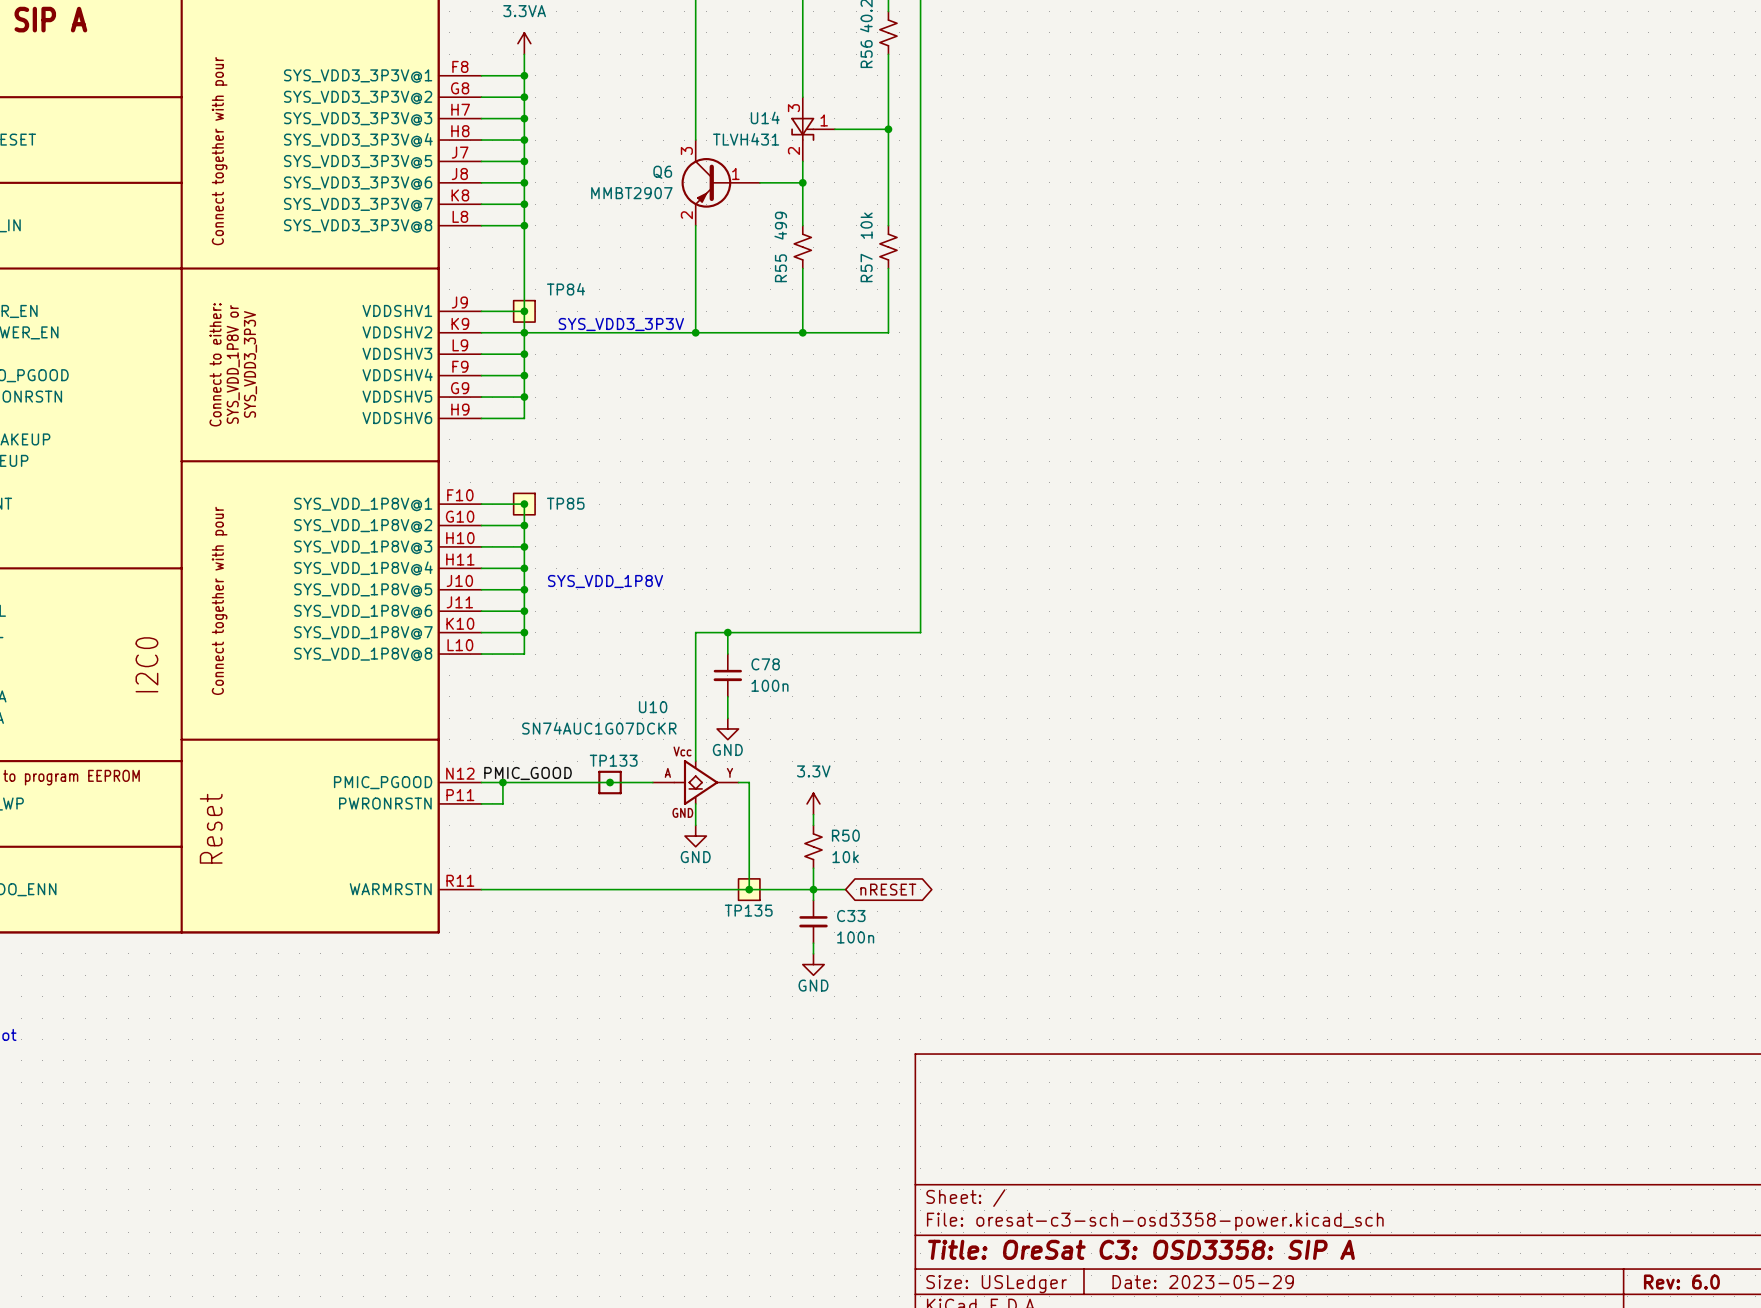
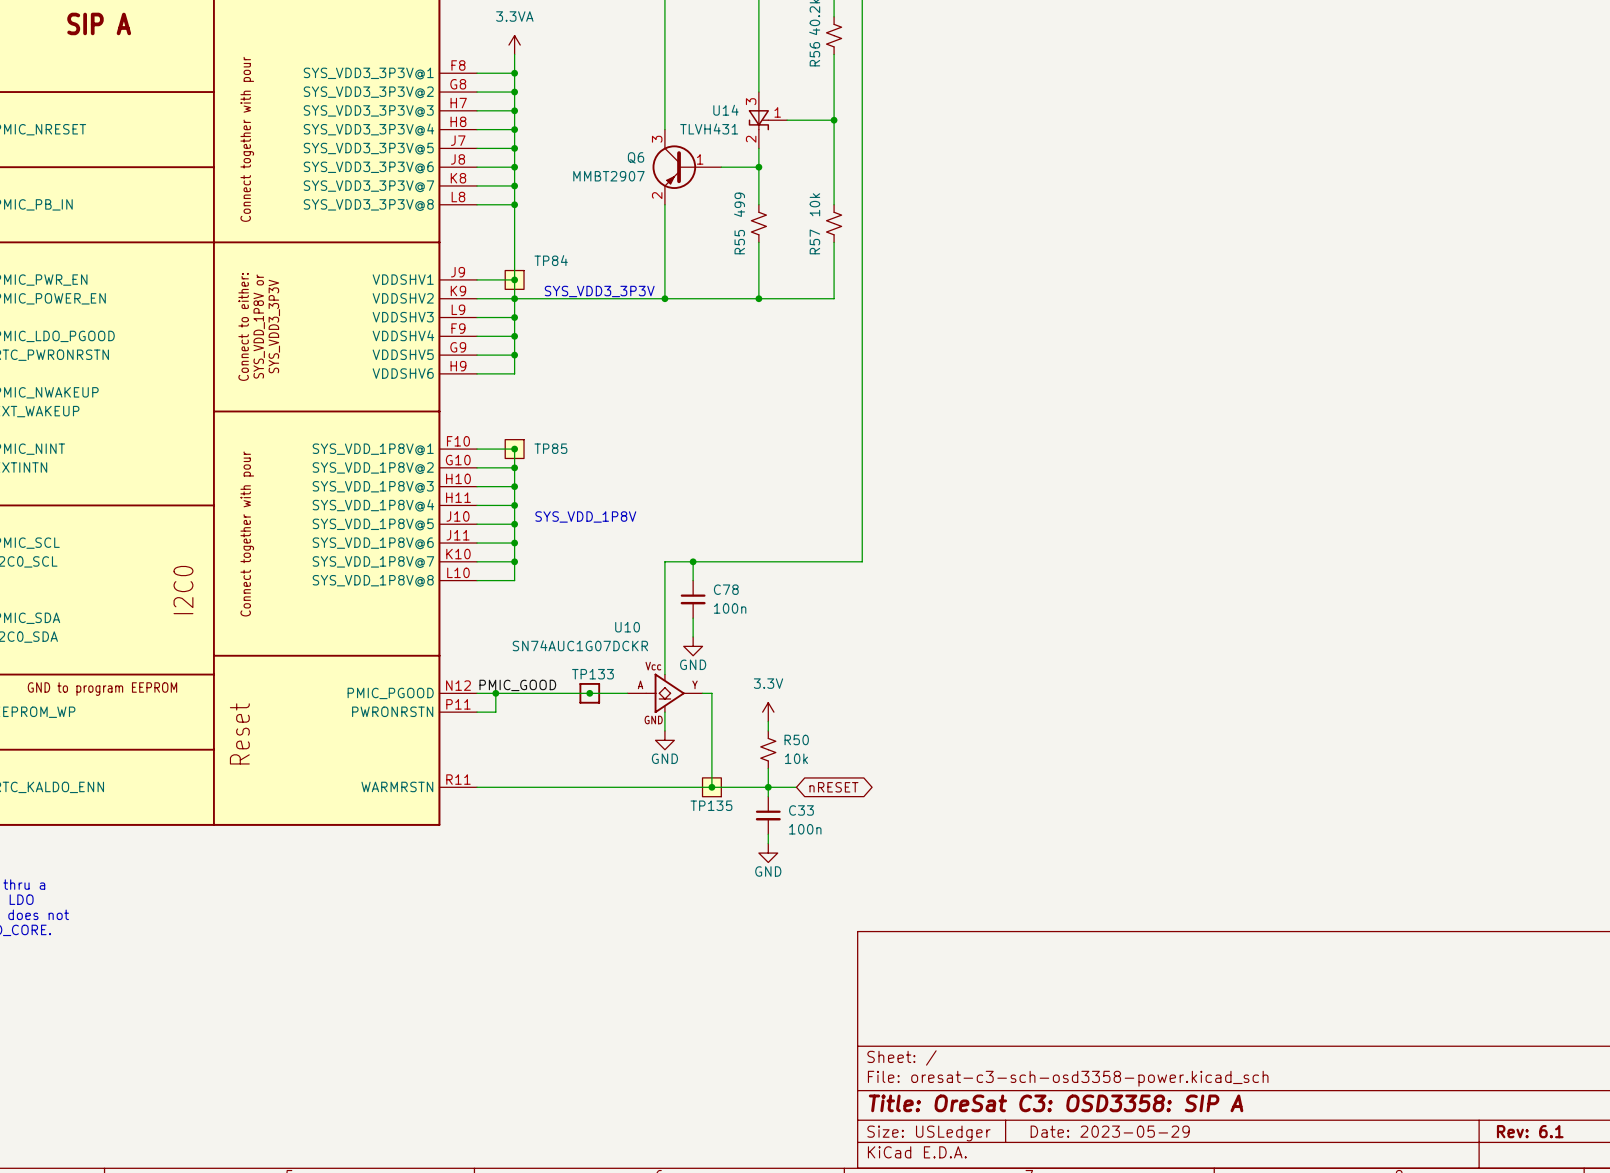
title block: Rev: 6.0 (1681, 1282) -> Rev: 6.1 (1530, 1131)

